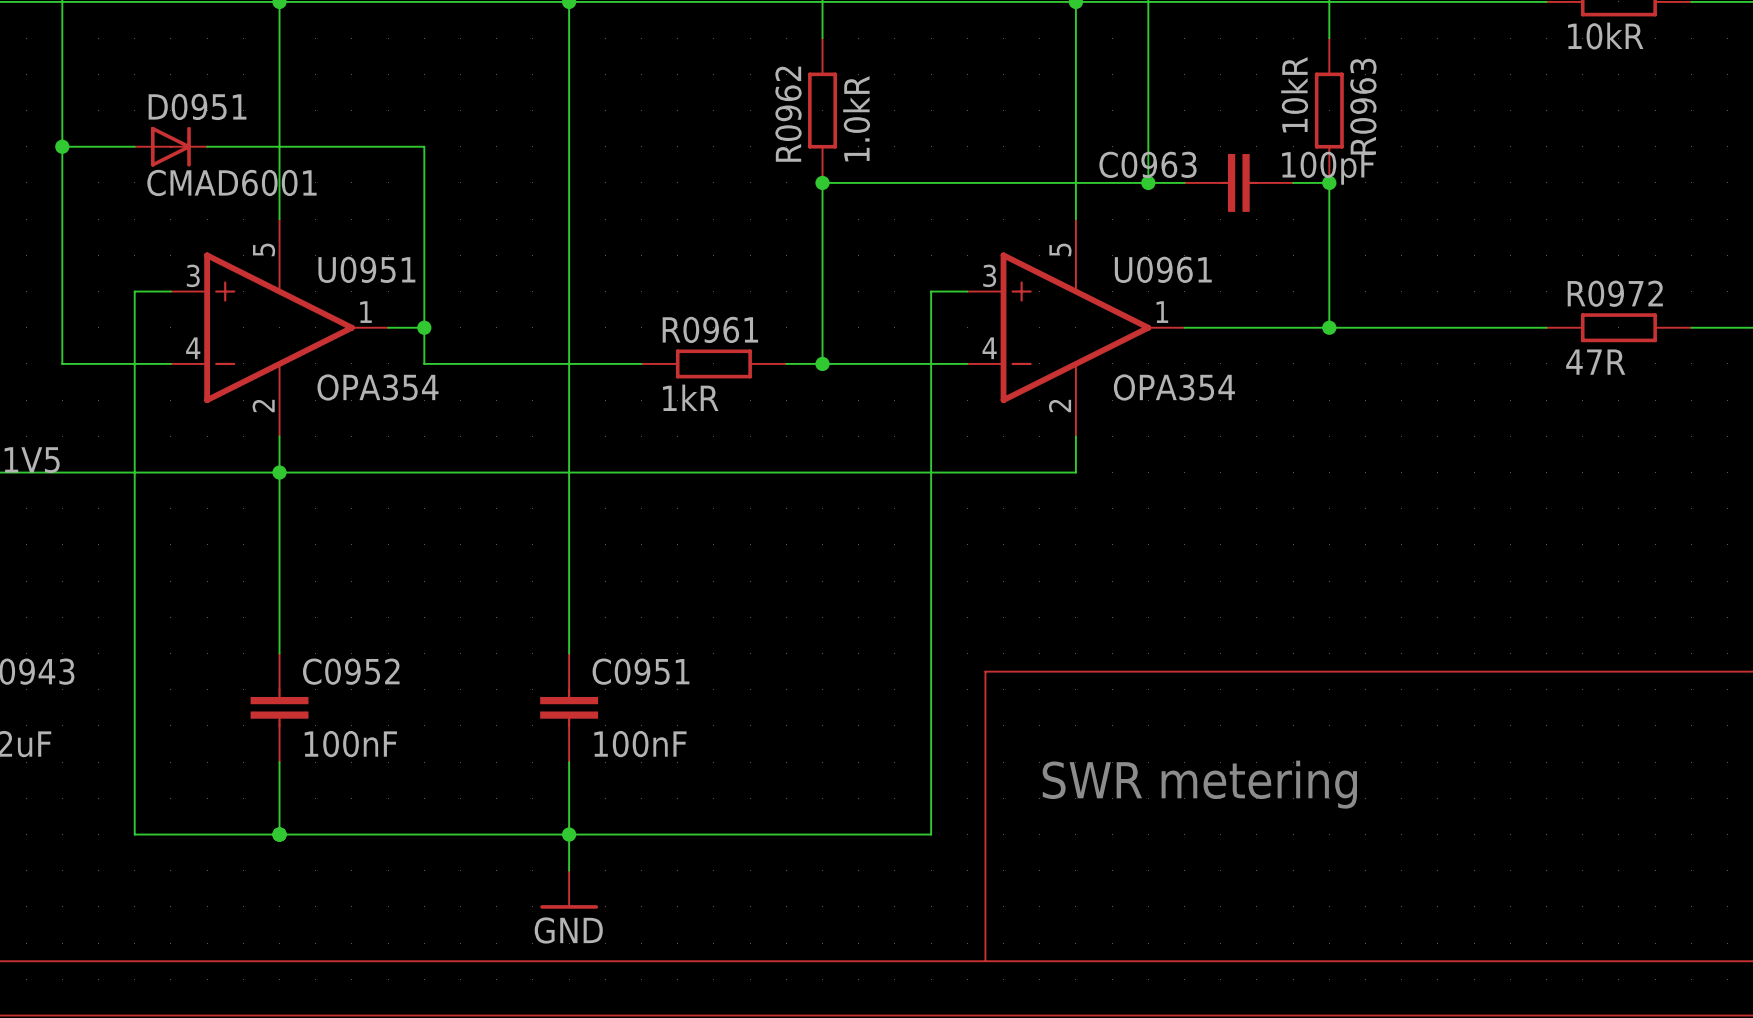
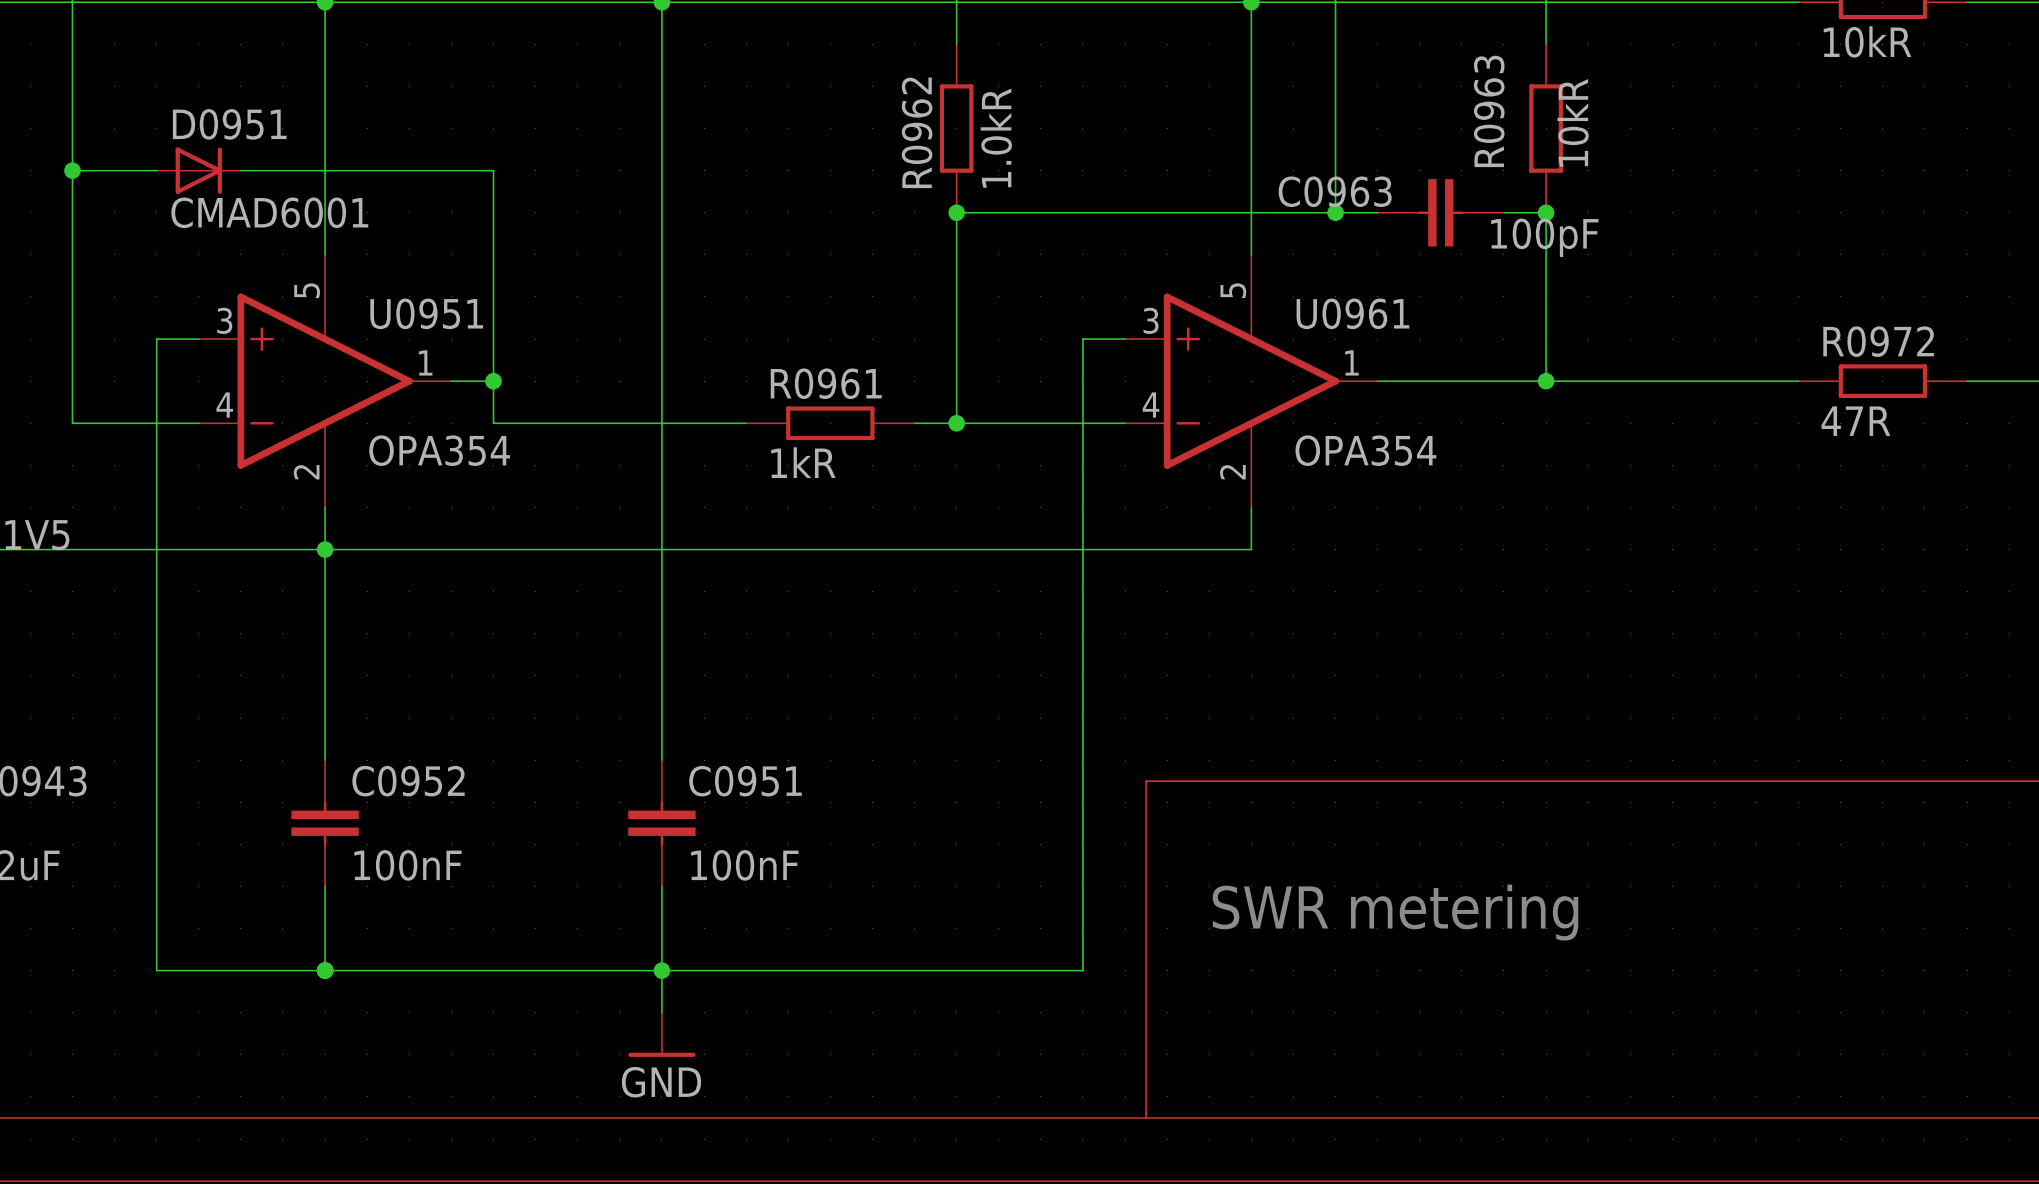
R0963 value position: 10kR (1294, 94) -> 10kR (1573, 122)
R0963 name position: R0963 (1363, 106) -> R0963 (1489, 111)
C0963 value position: 100pF (1328, 168) -> 100pF (1544, 237)

